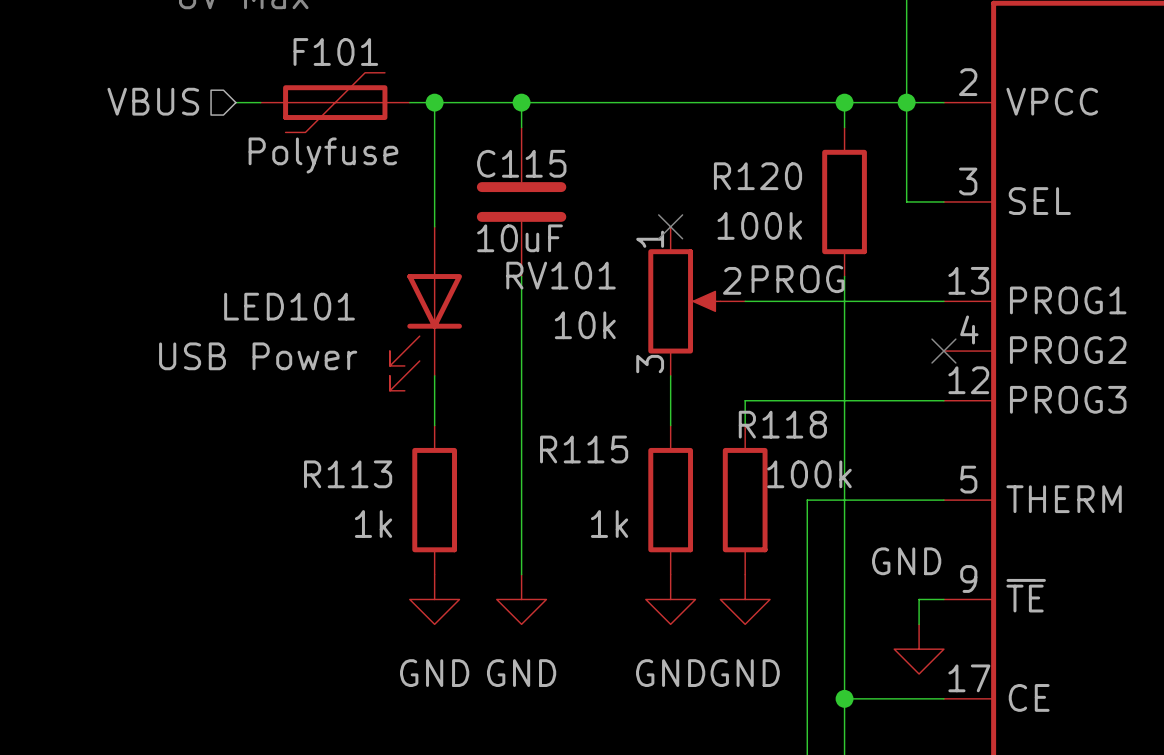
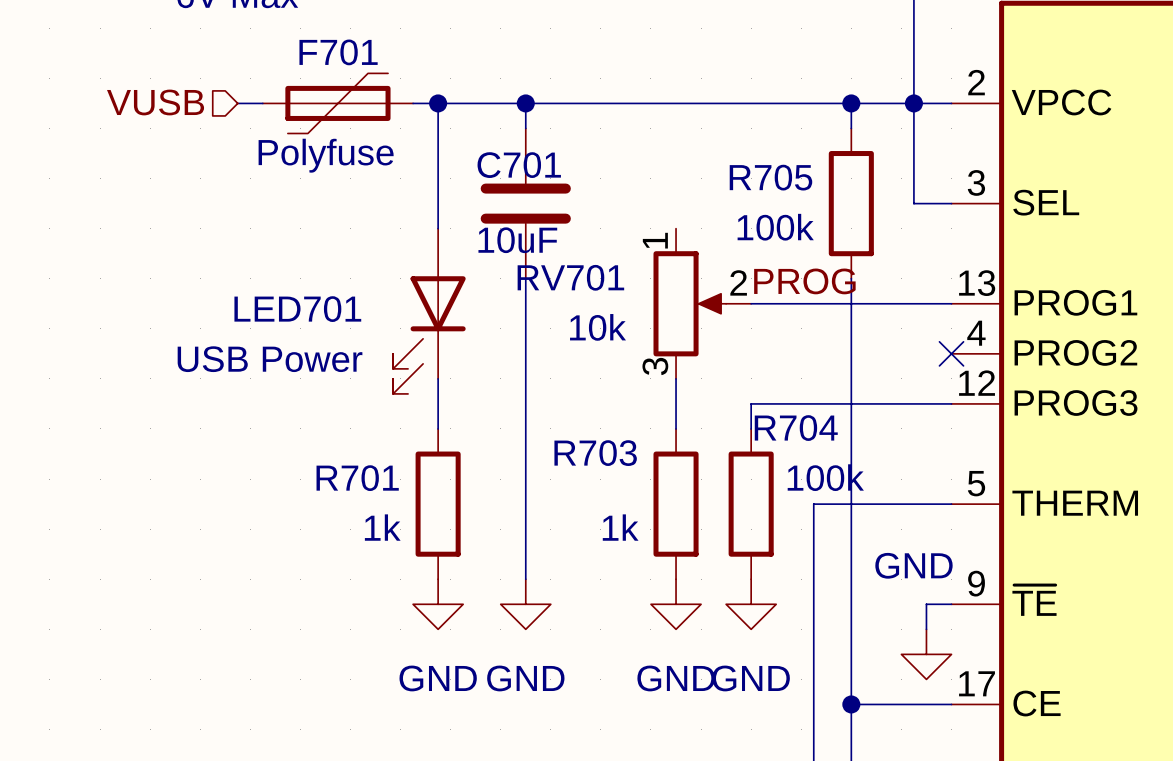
F101 name: F101 (335, 52) -> F701 (338, 52)
hierarchical label: VBUS (153, 101) -> VUSB (155, 102)
C115 name: C115 (521, 163) -> C701 (519, 165)
R120 name: R120 (758, 176) -> R705 (770, 177)
no-connect mark: (670, 226) -> none
RV101 name: RV101 (561, 275) -> RV701 (570, 277)
LED101 name: LED101 (289, 306) -> LED701 (297, 309)
R118 name: R118 (782, 424) -> R704 (796, 428)
R115 name: R115 (584, 449) -> R703 (595, 453)
R113 name: R113 (348, 474) -> R701 (357, 478)

